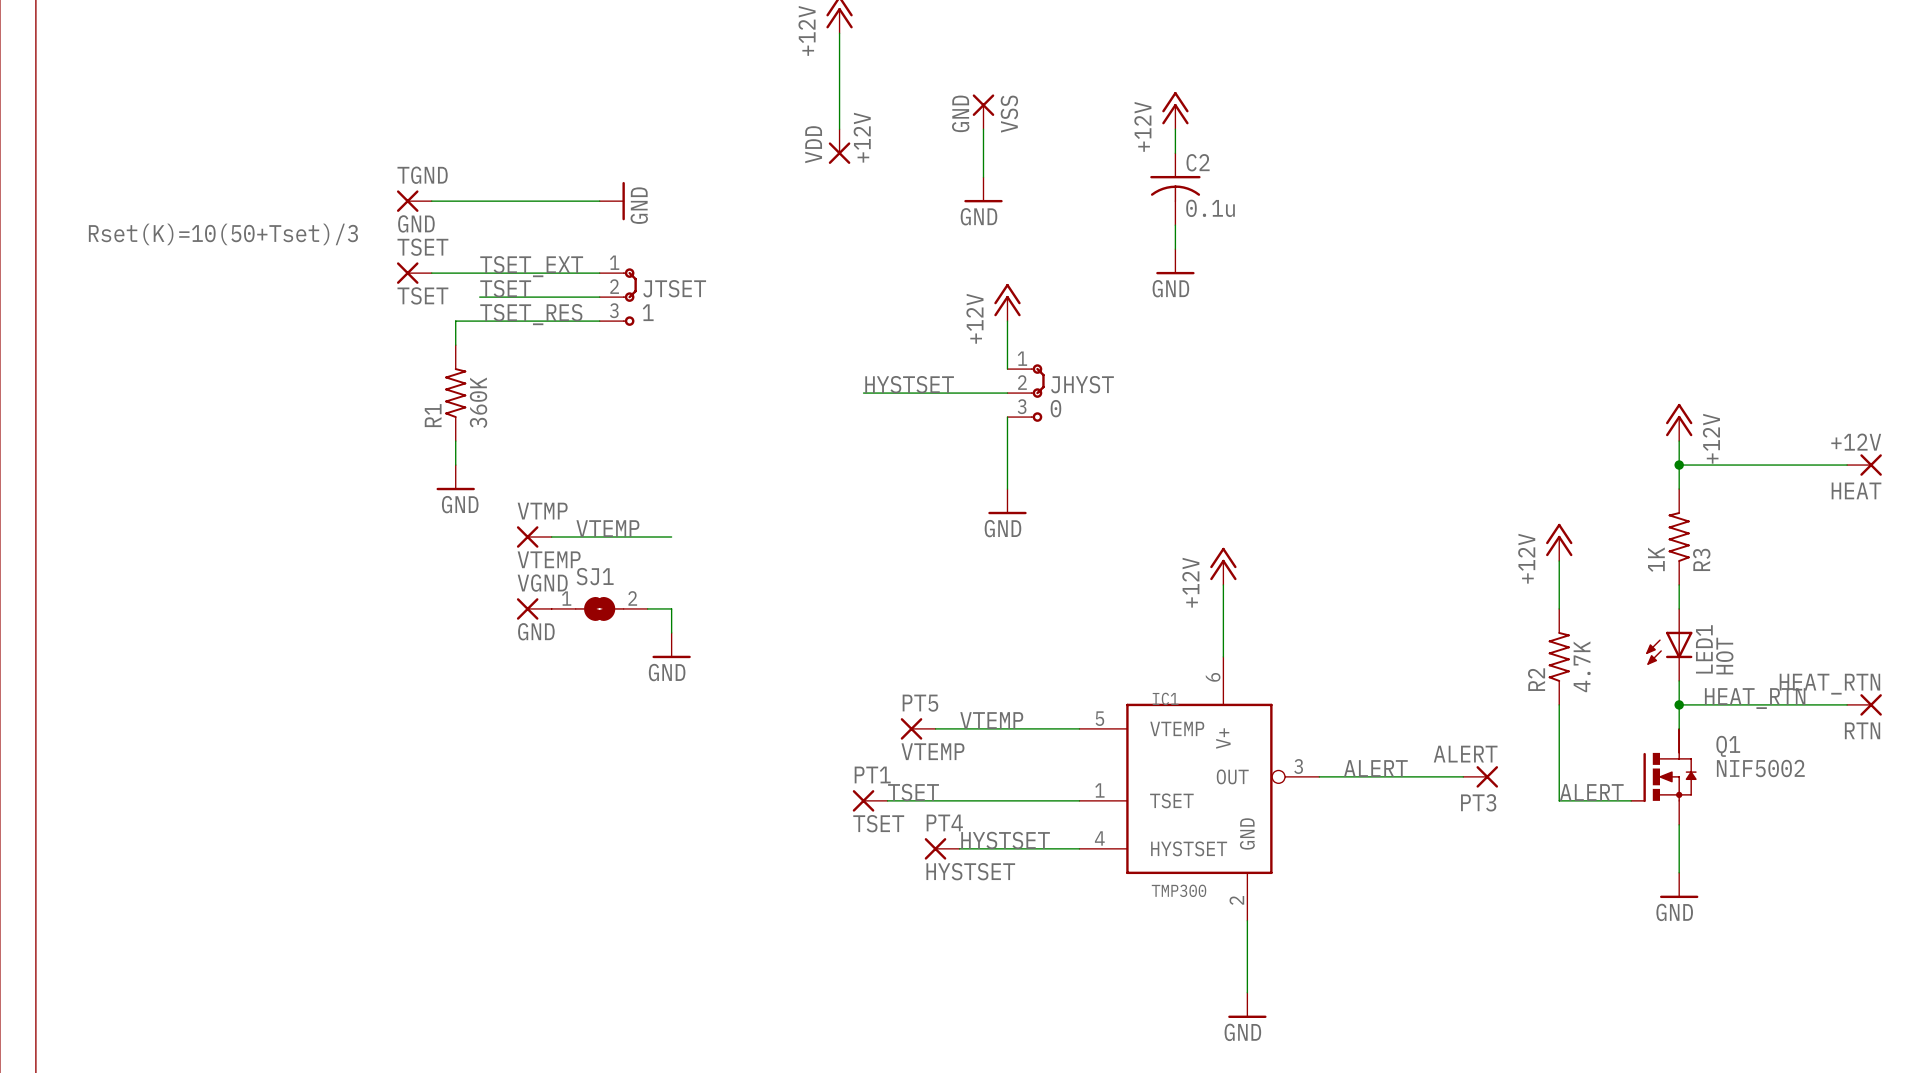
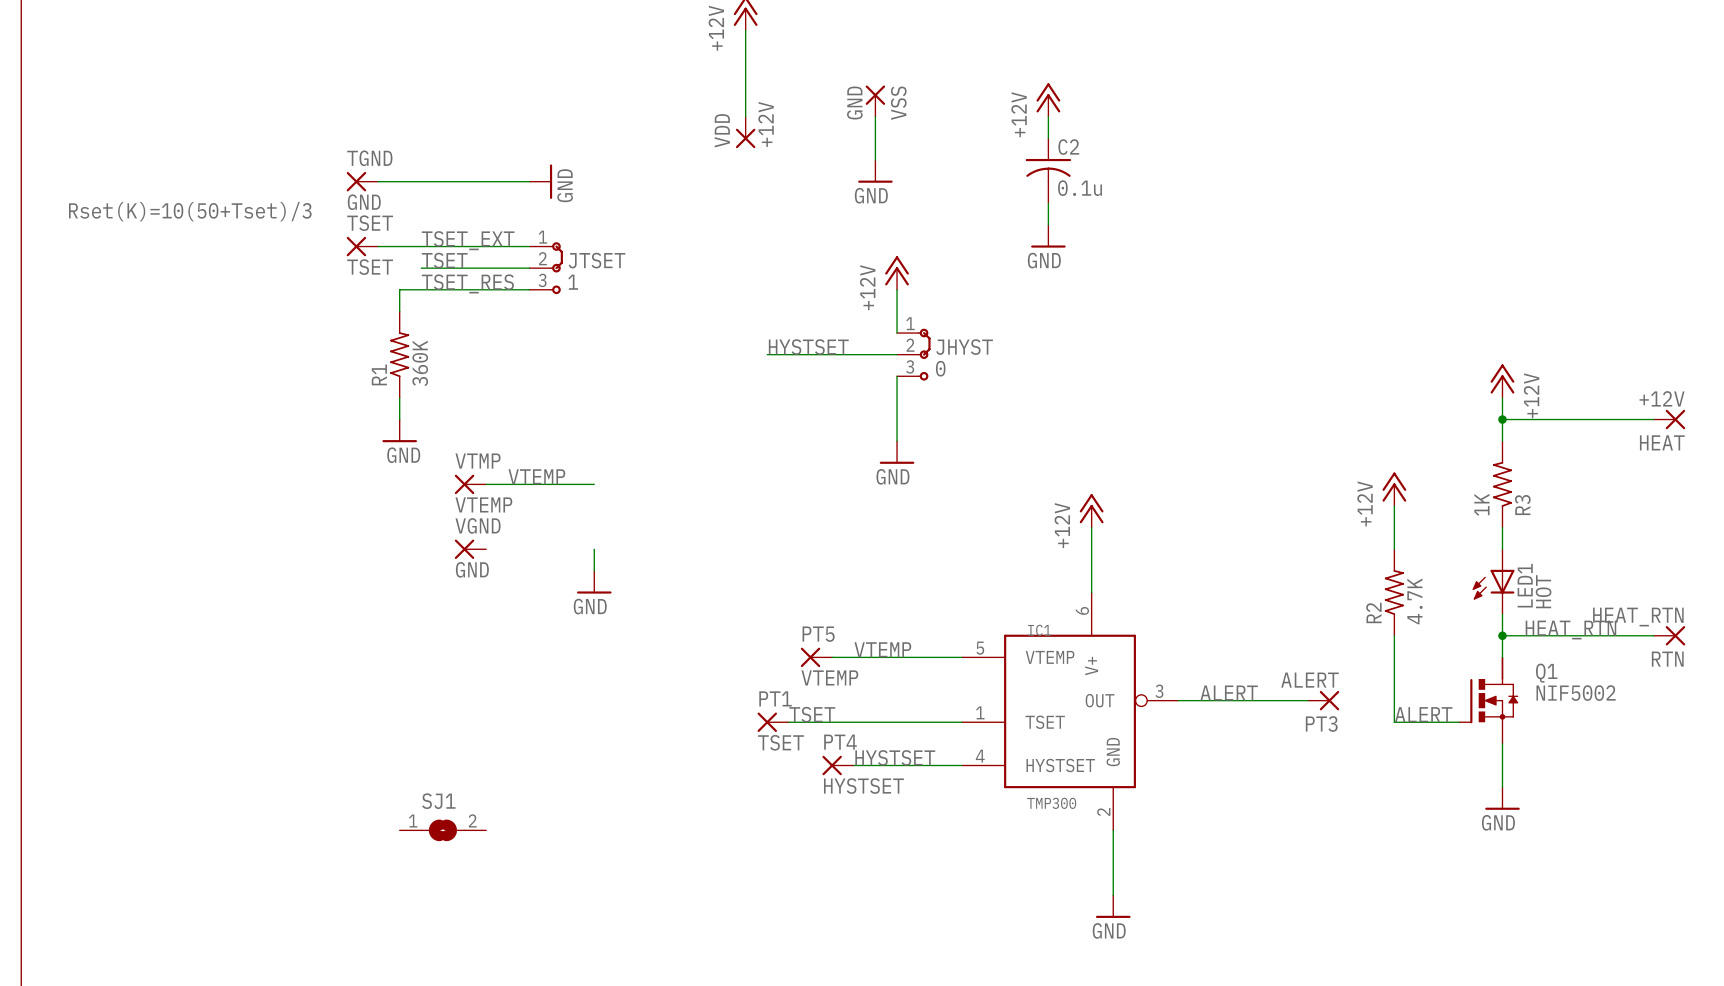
SJ1 position: (599, 608) -> (442, 830)
wire: (647, 608) (671, 608) -> none

